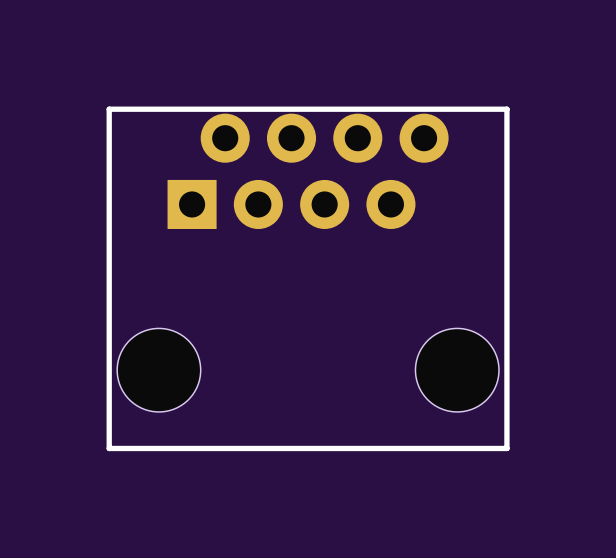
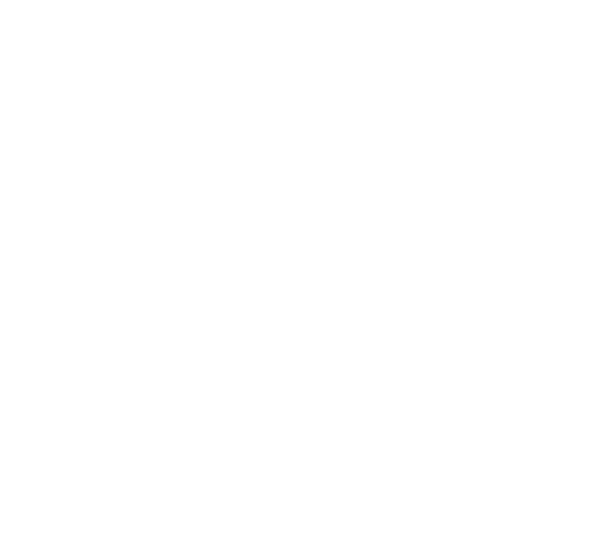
part: (308, 278) -> none

